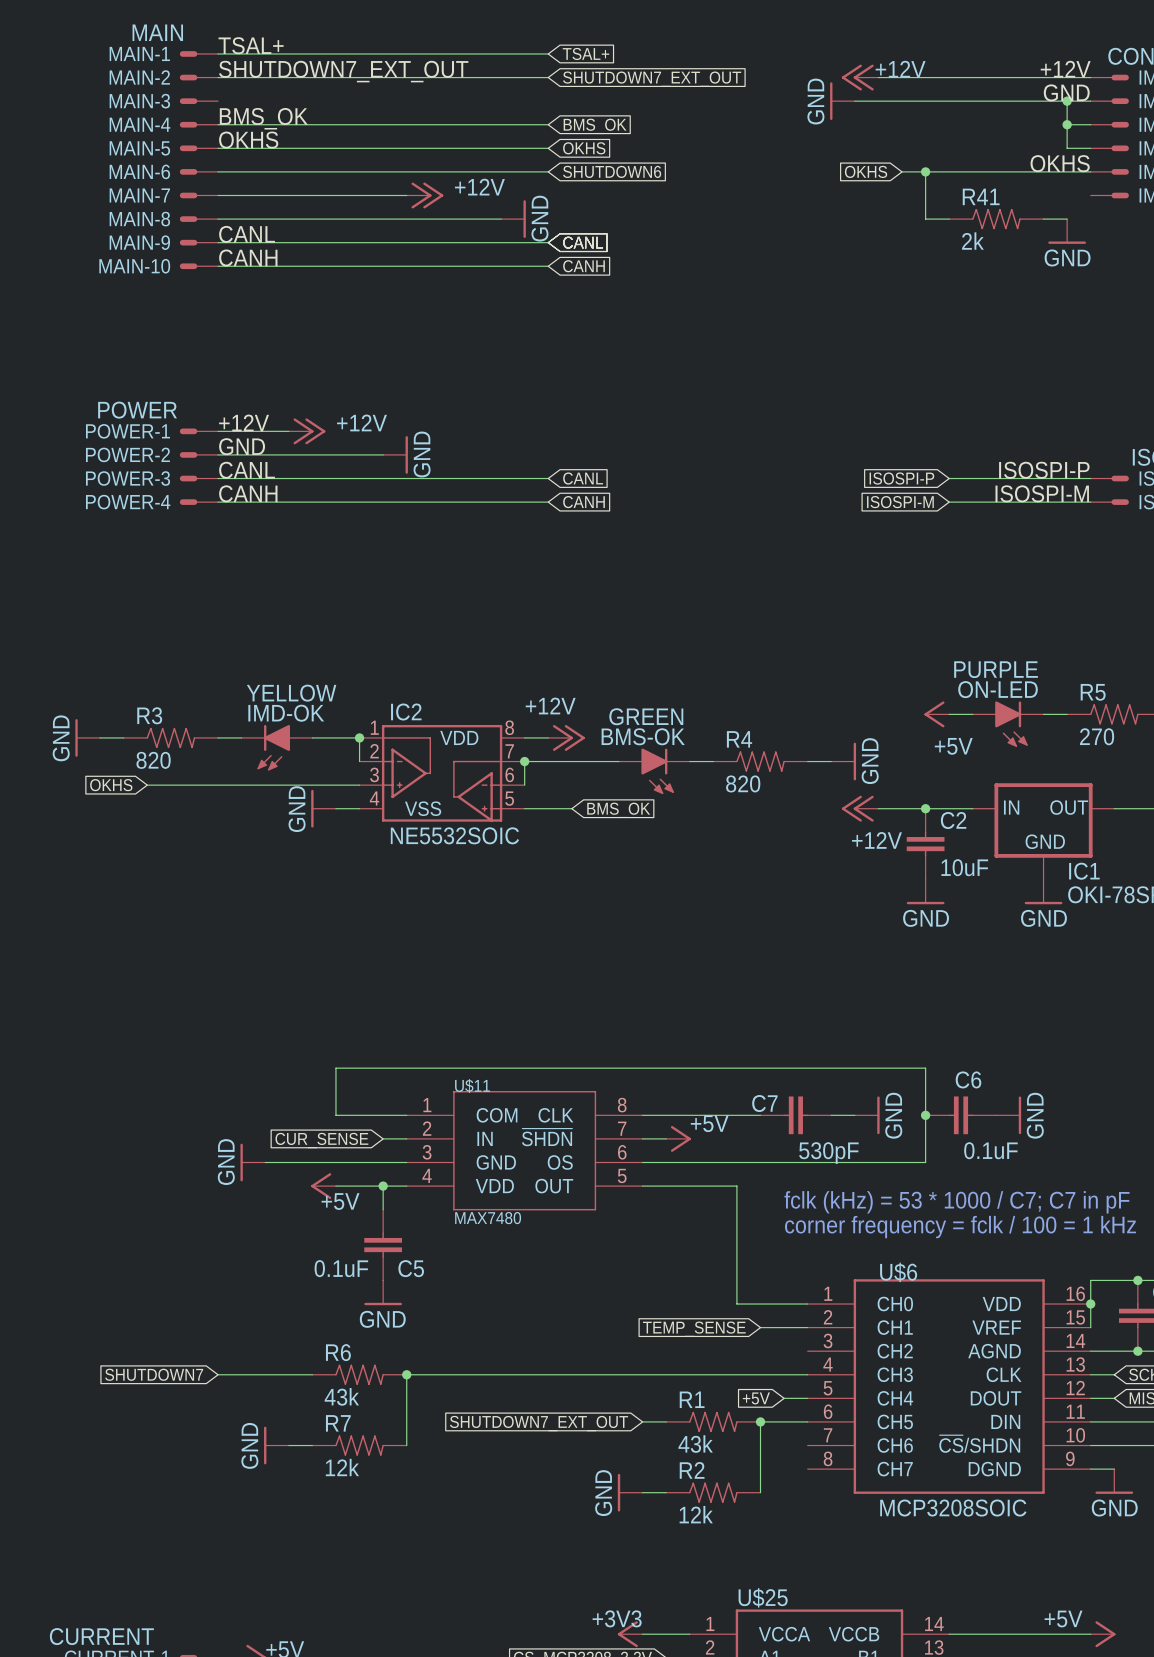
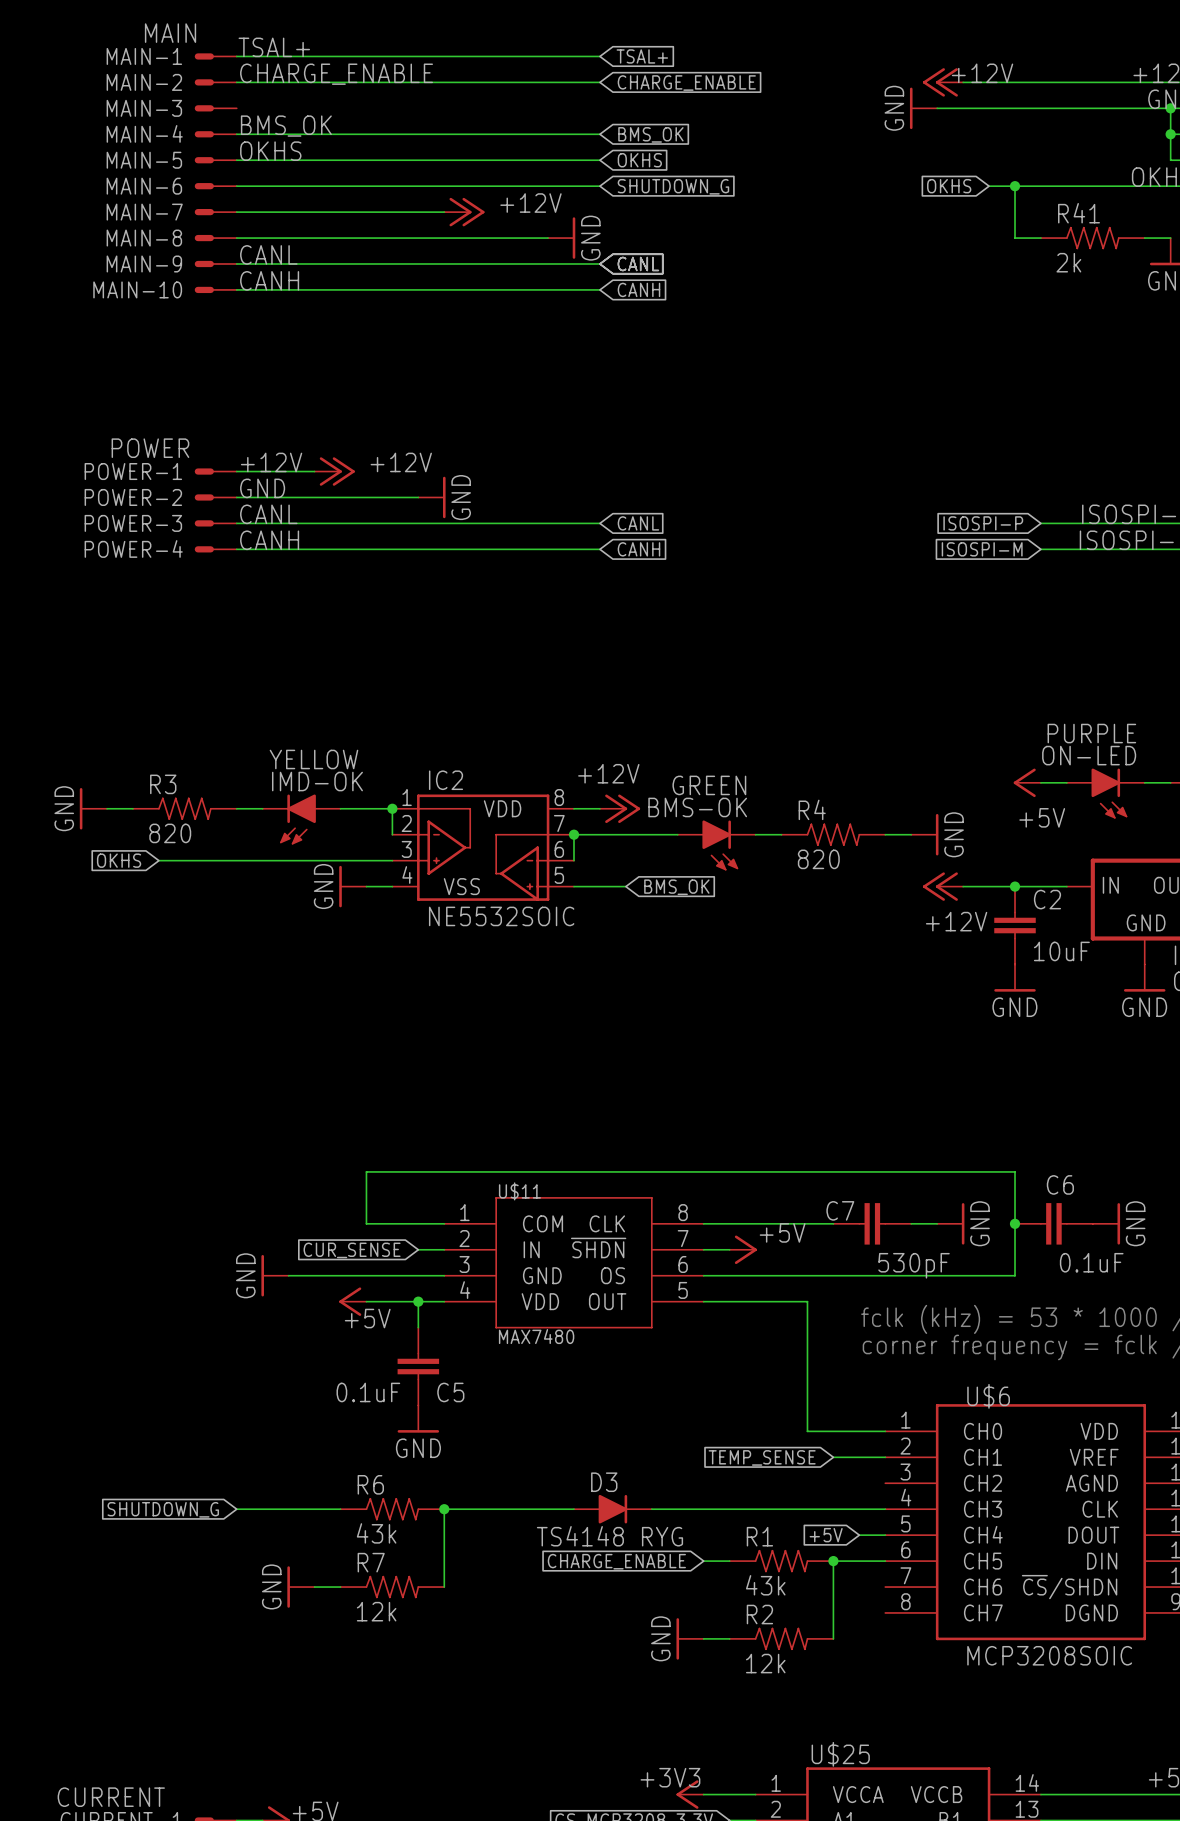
label: SHUTDOWN7_EXT_OUT (343, 71) -> CHARGE_ENABLE (336, 74)
global label: SHUTDOWN7_EXT_OUT (652, 79) -> CHARGE_ENABLE (686, 83)
global label: SHUTDOWN6 (612, 171) -> SHUTDOWN_G (673, 186)
global label: SHUTDOWN7 (154, 1374) -> SHUTDOWN_G (163, 1509)
D3: none -> TS4148 RYG (612, 1509)
global label: SHUTDOWN7_EXT_OUT (539, 1423) -> CHARGE_ENABLE (616, 1561)

